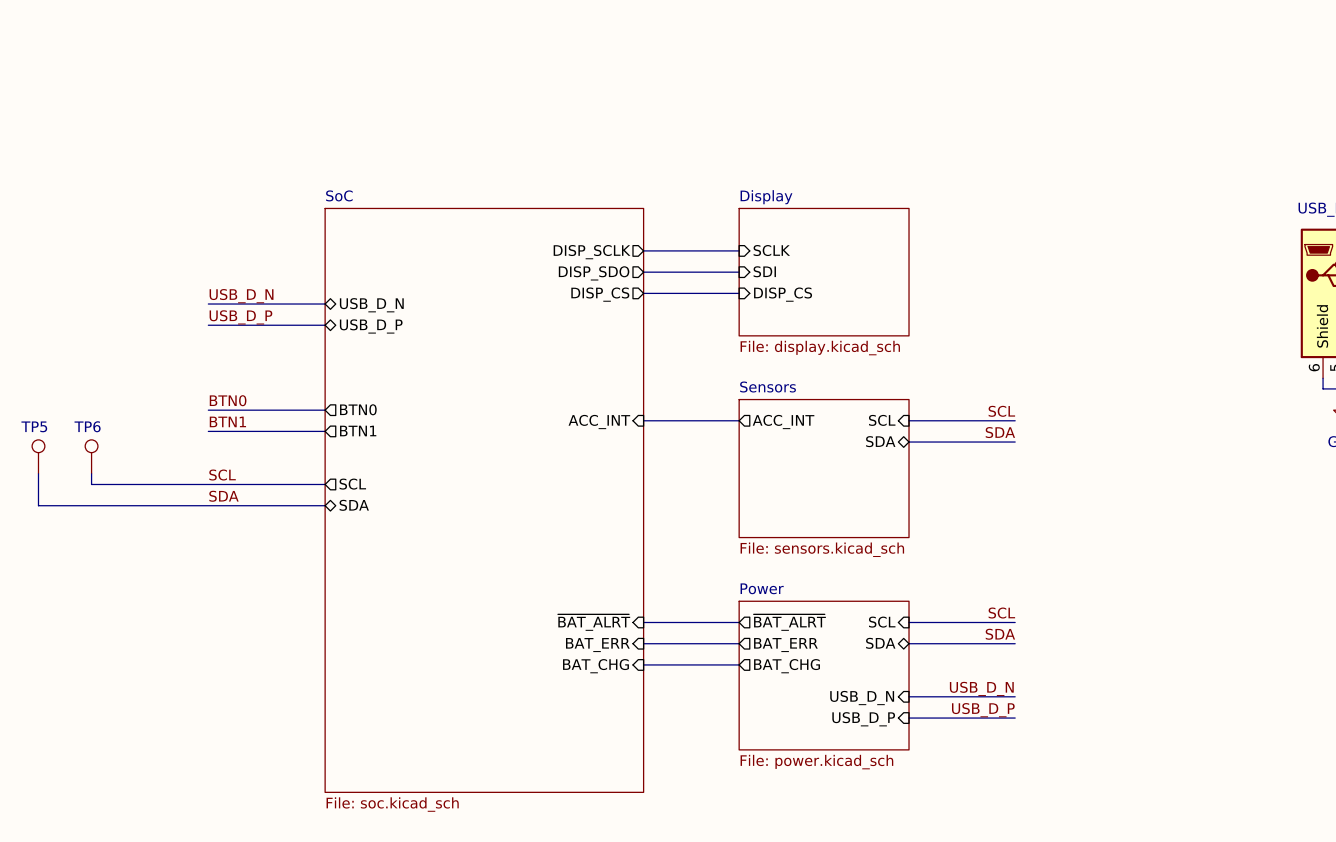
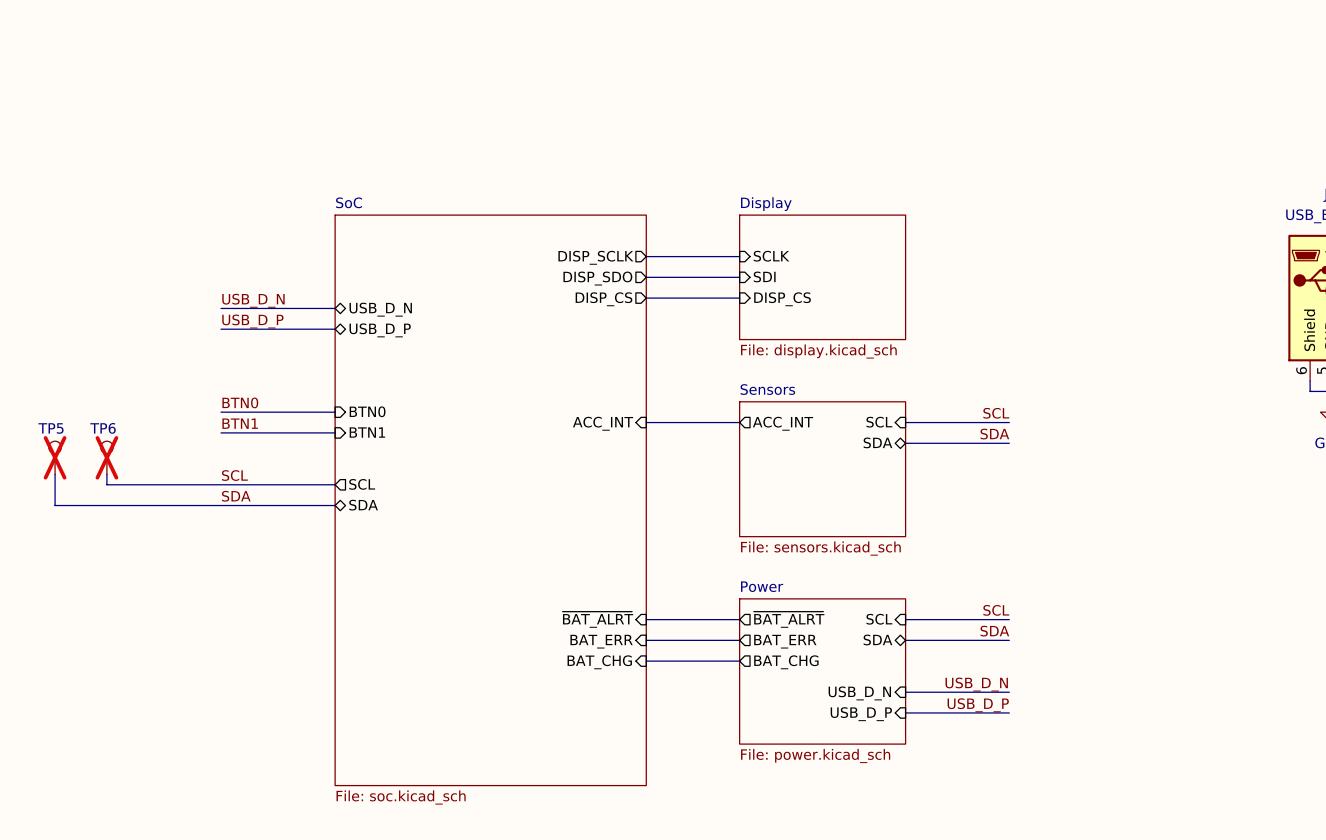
sheet pin shape: output (358, 409) -> input (367, 411)
sheet pin shape: output (358, 431) -> input (367, 432)
TP5 do-not-place cross: none -> (55, 457)
TP6 do-not-place cross: none -> (106, 457)

